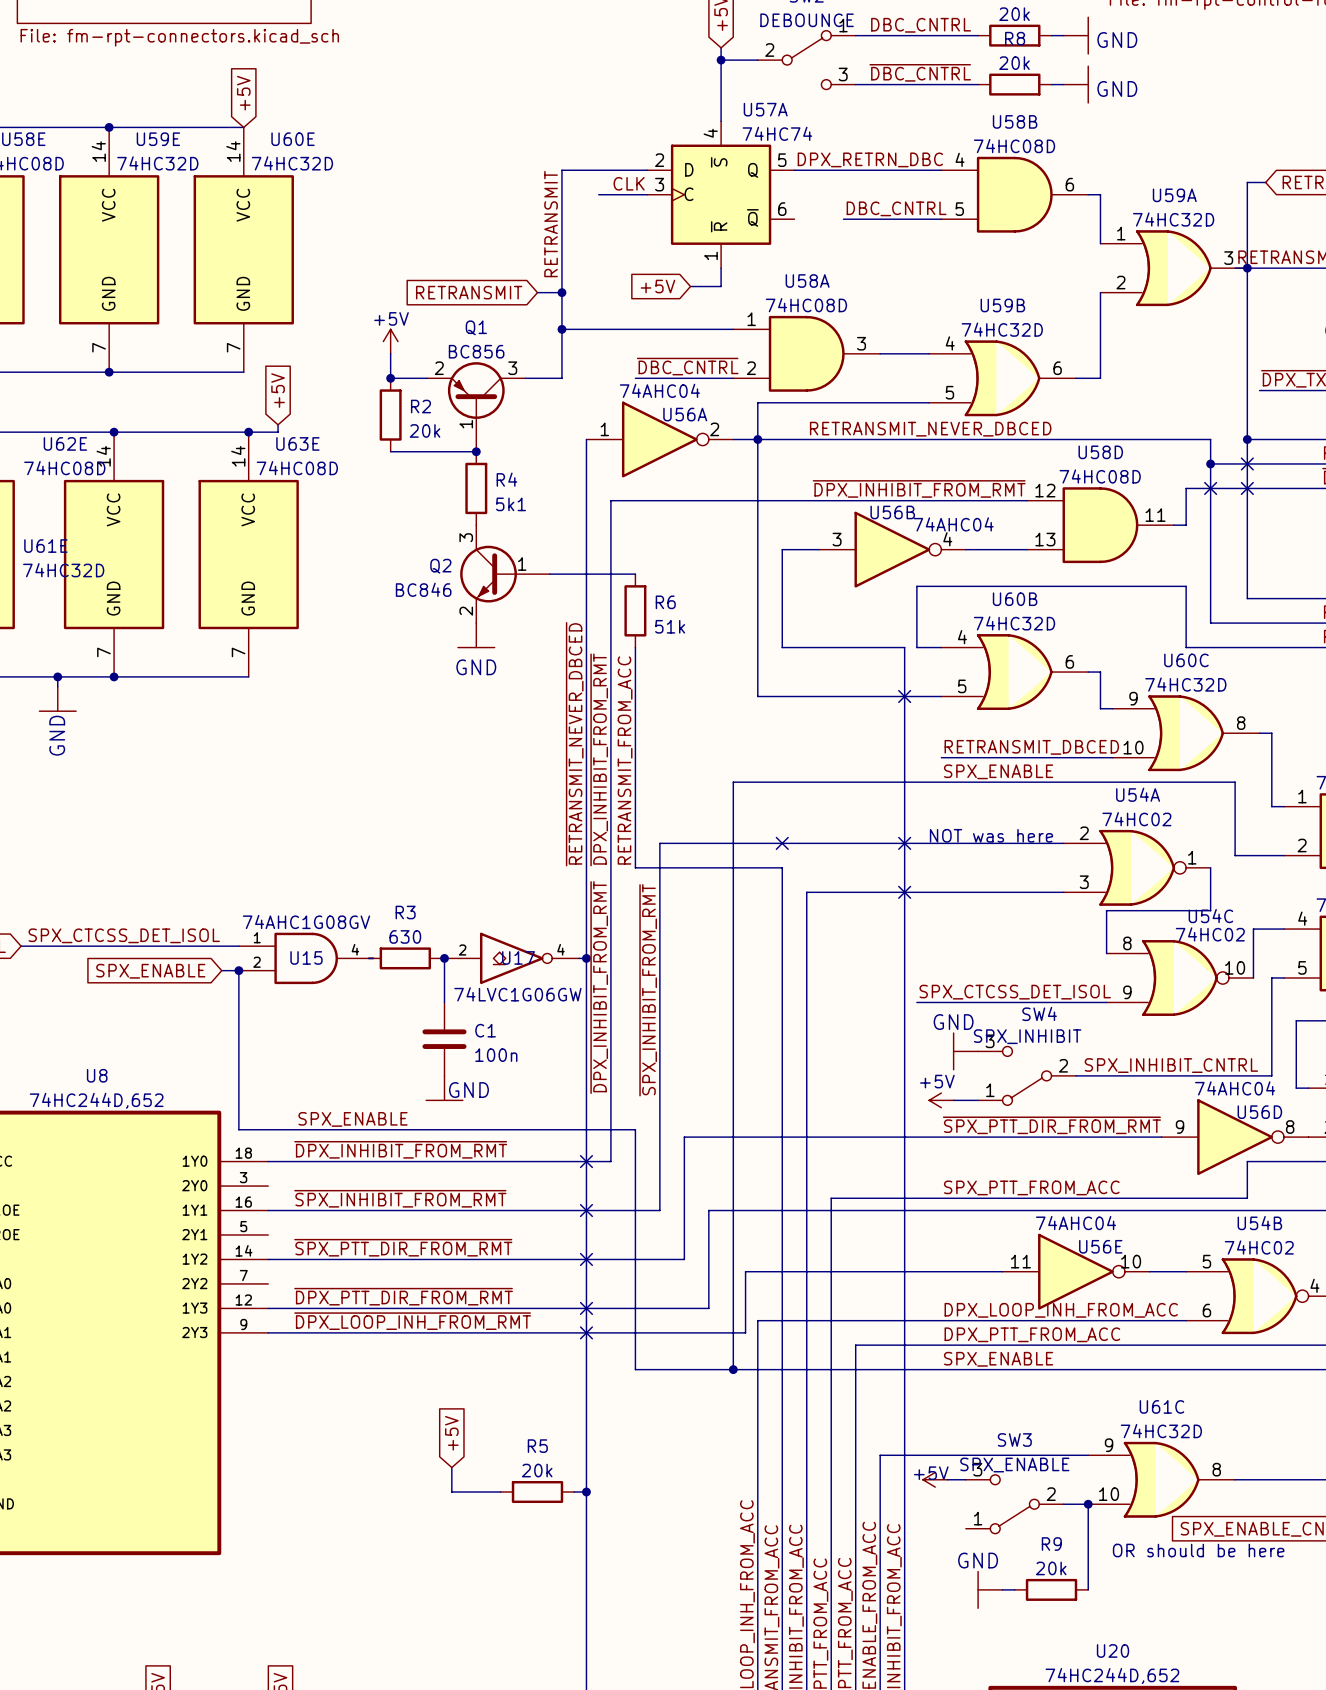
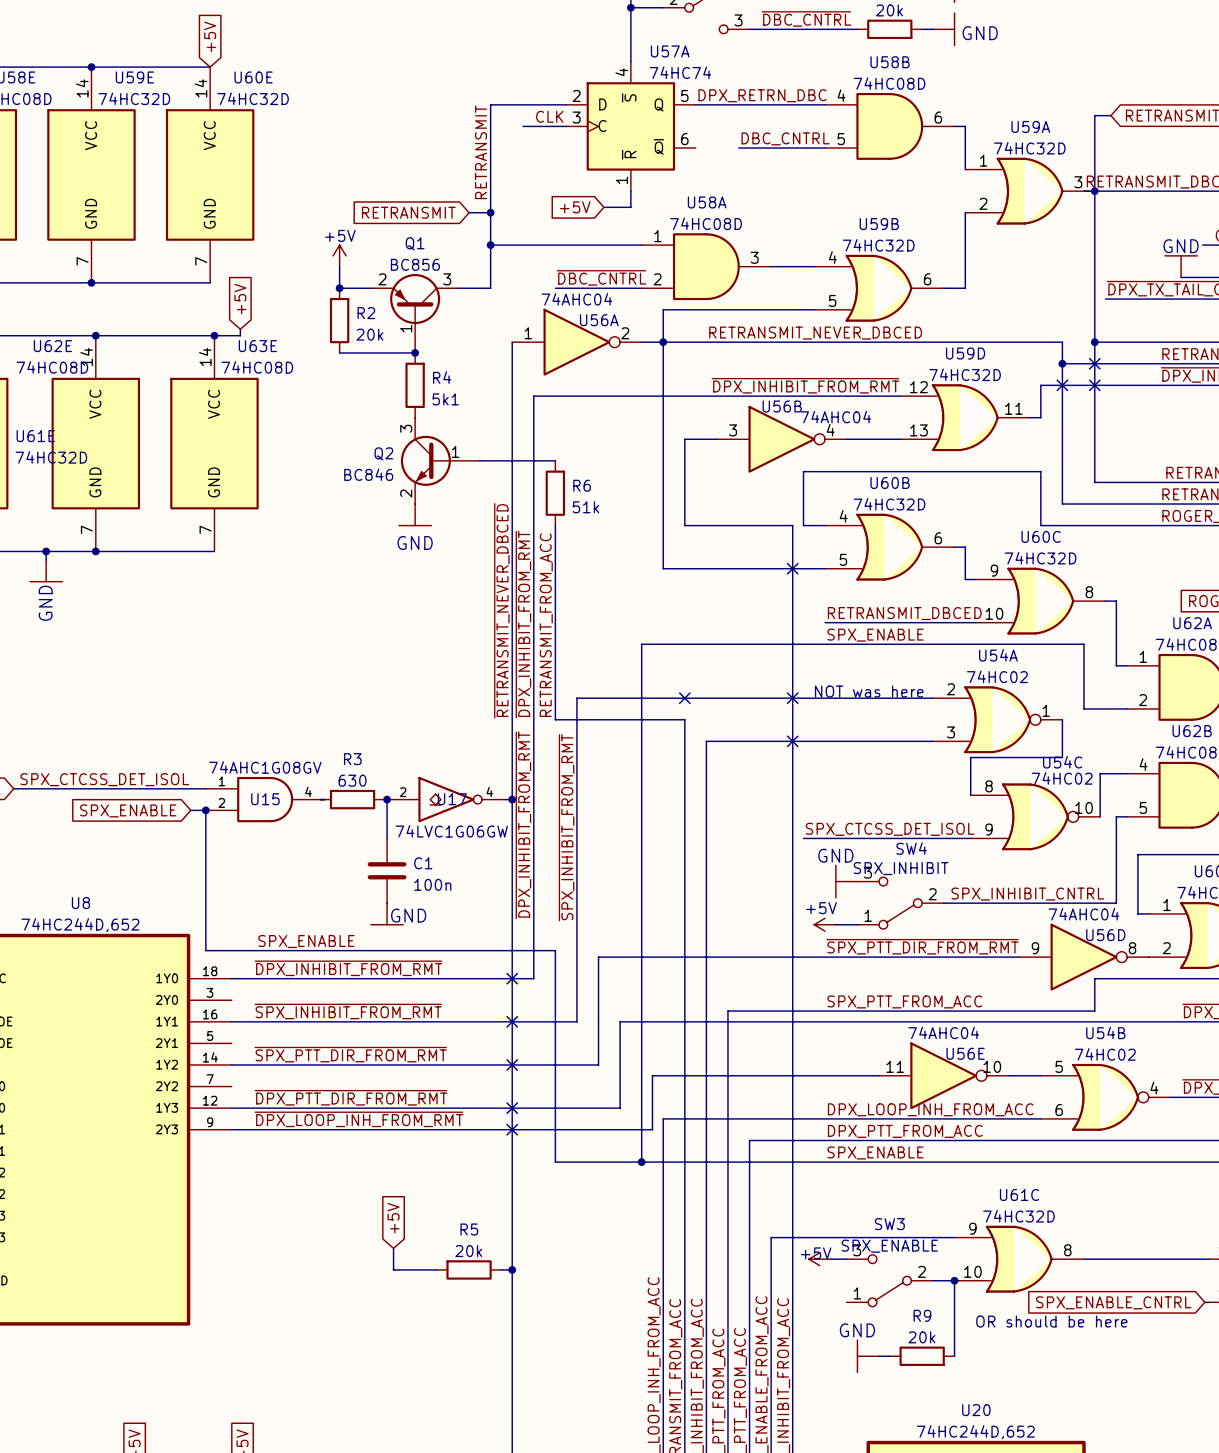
U58D: 74HC08D (1100, 525) -> none
U59D: none -> 74HC32D (965, 417)

